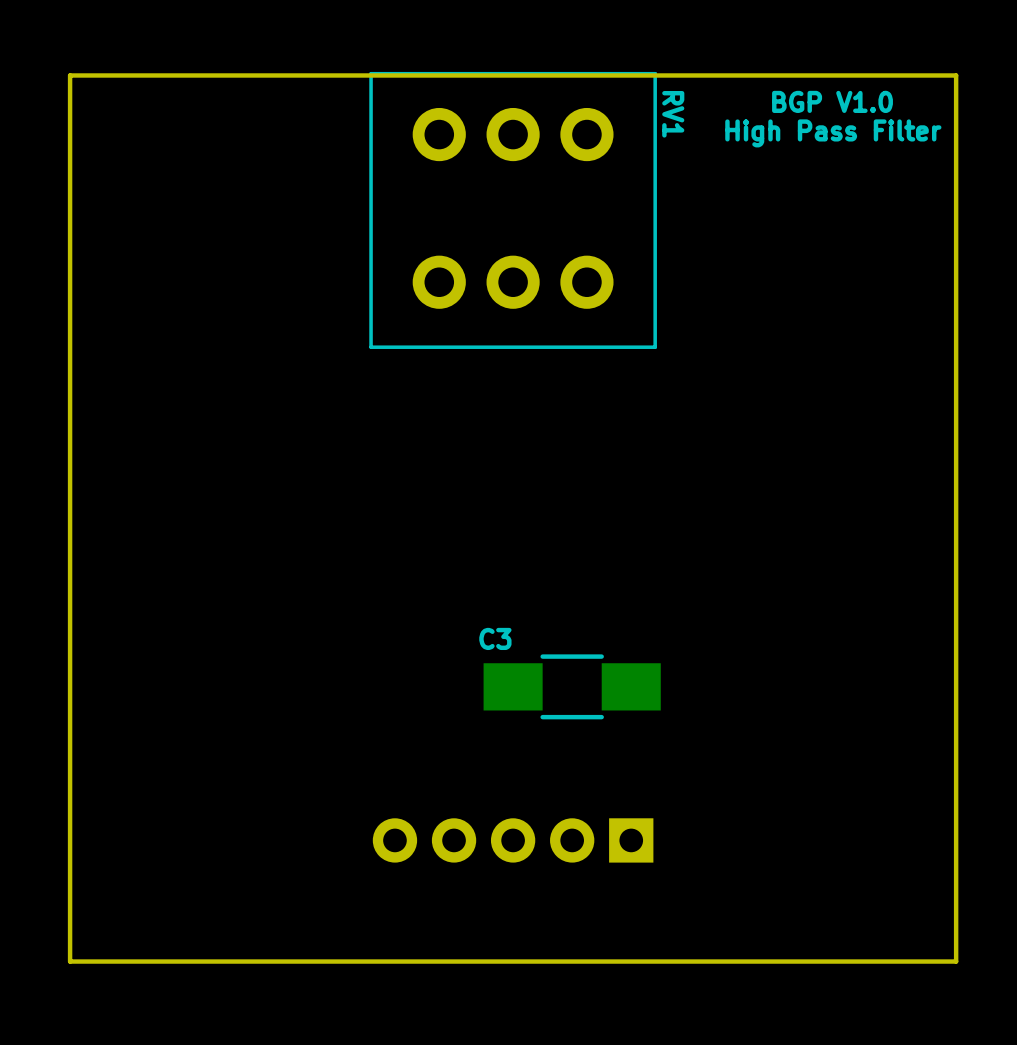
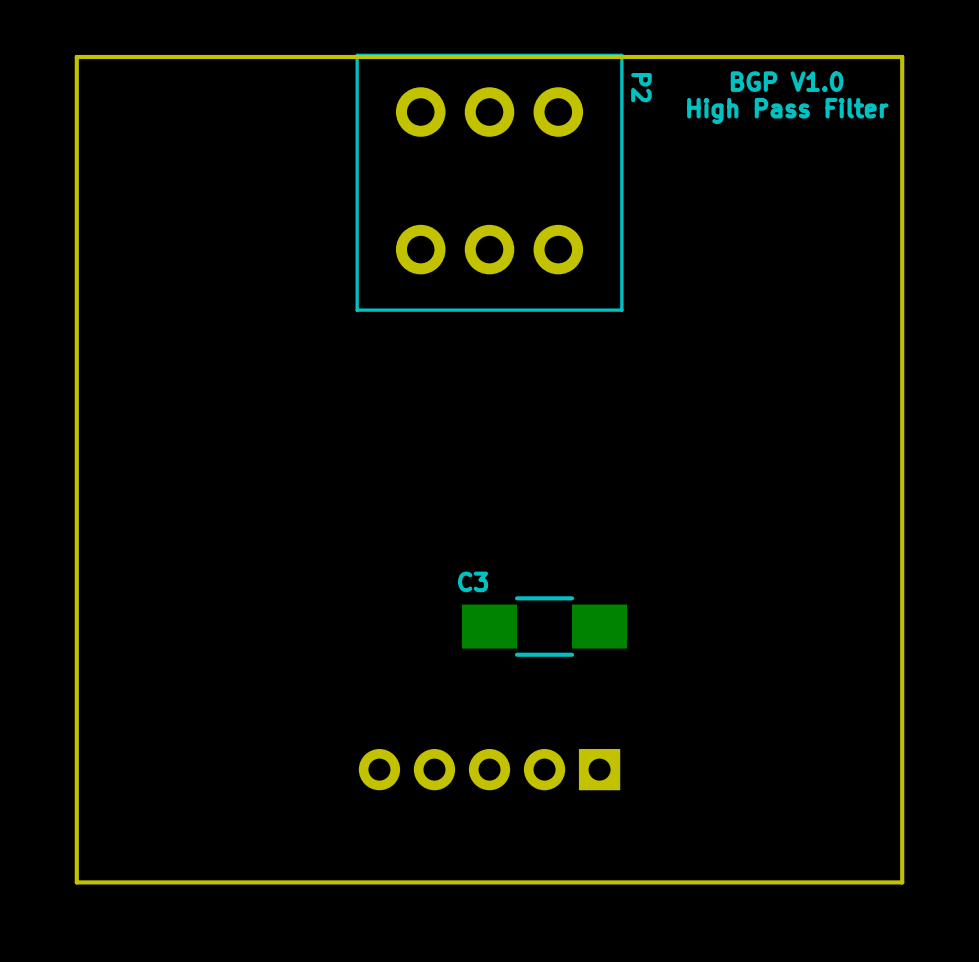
RV1 name: RV1 (673, 114) -> P2 (641, 87)

